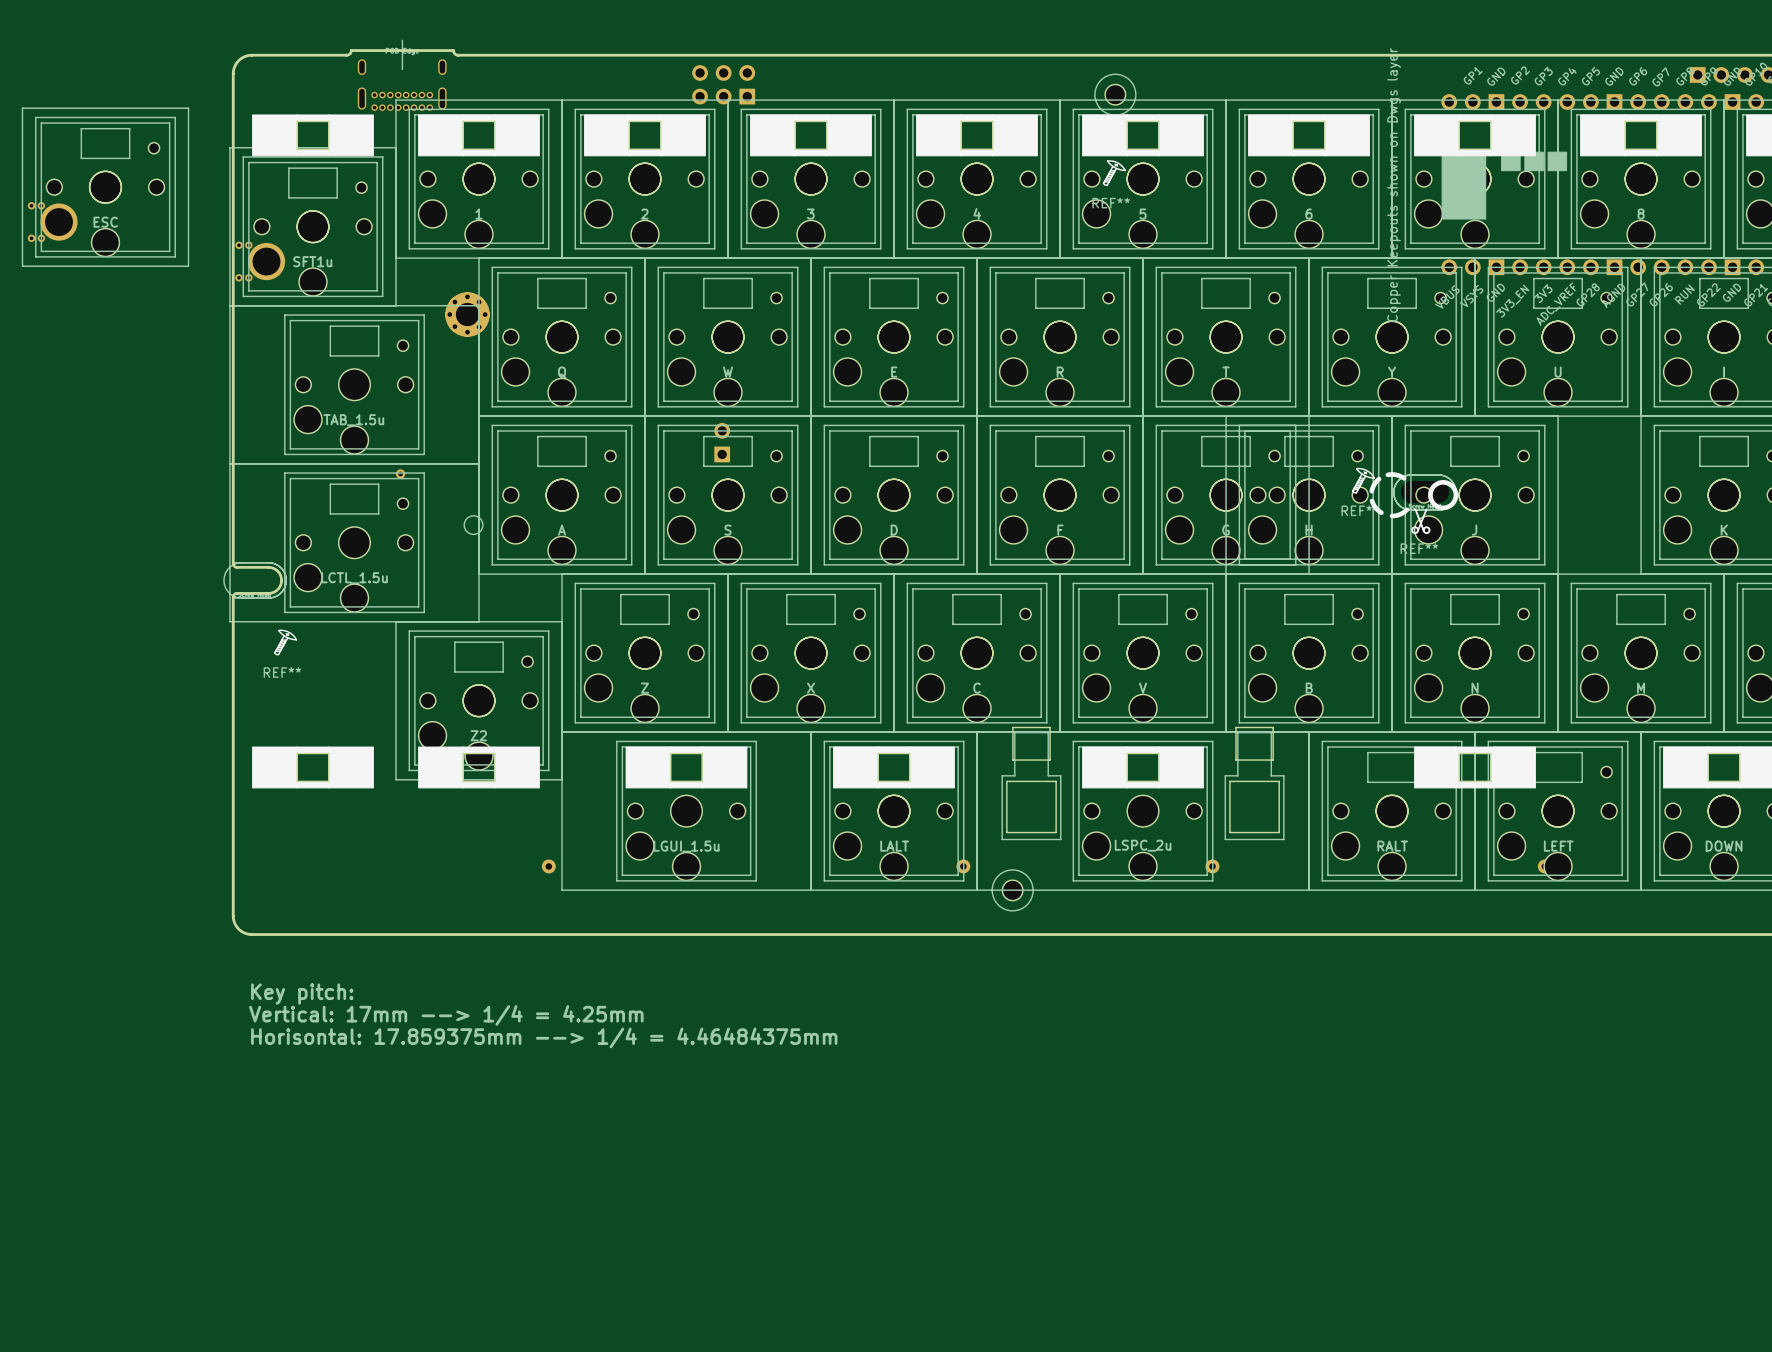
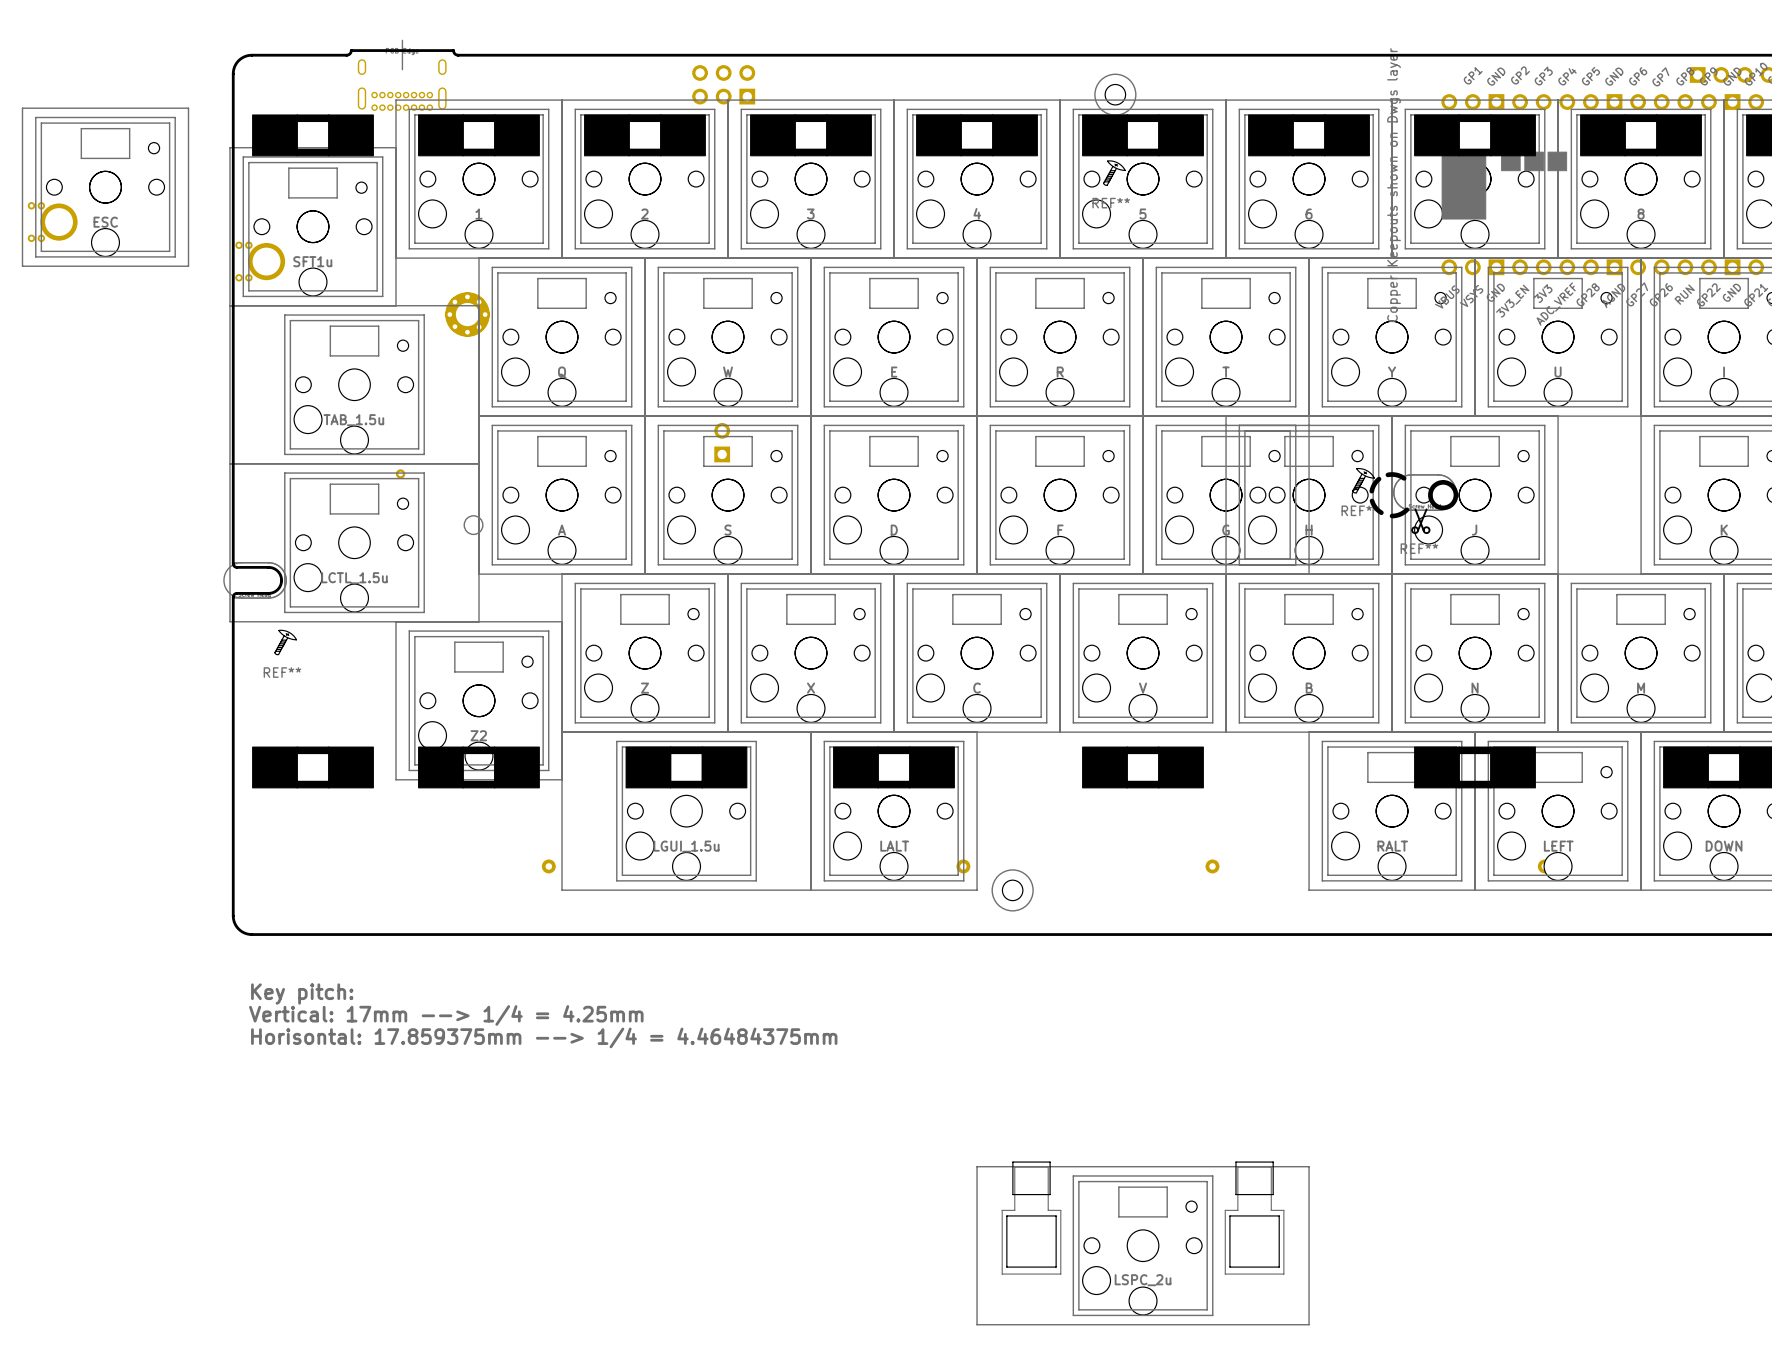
part: LSPC_2u (1143, 808) -> none
part: none -> LSPC_2u (1143, 1243)

